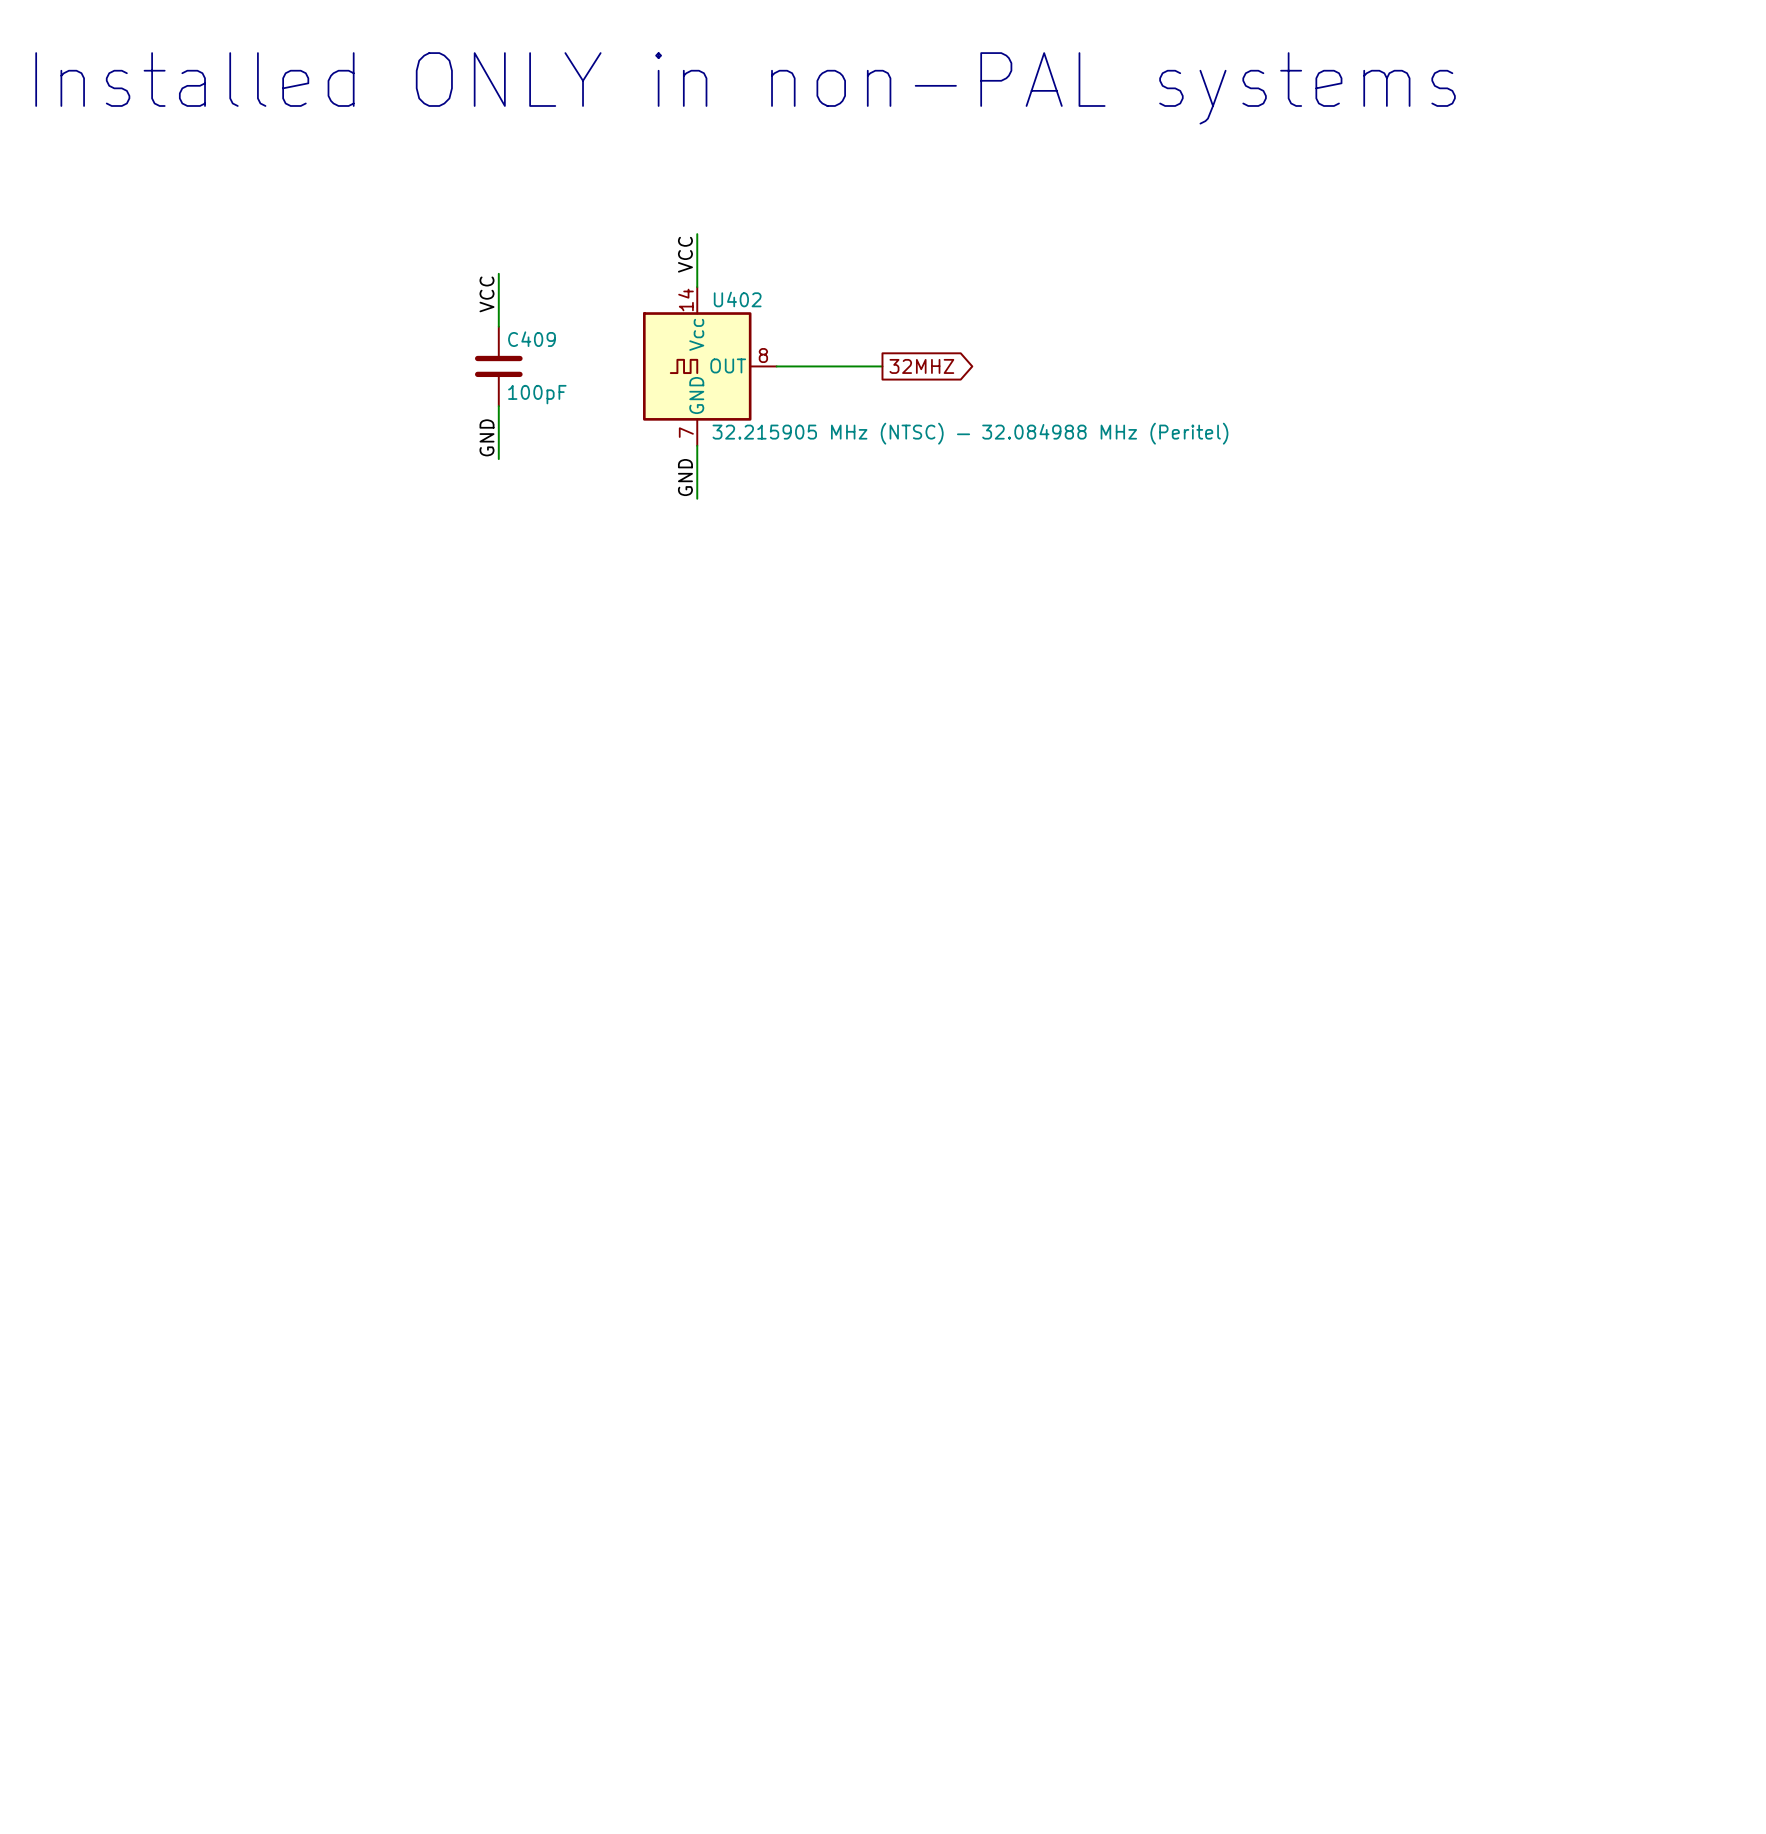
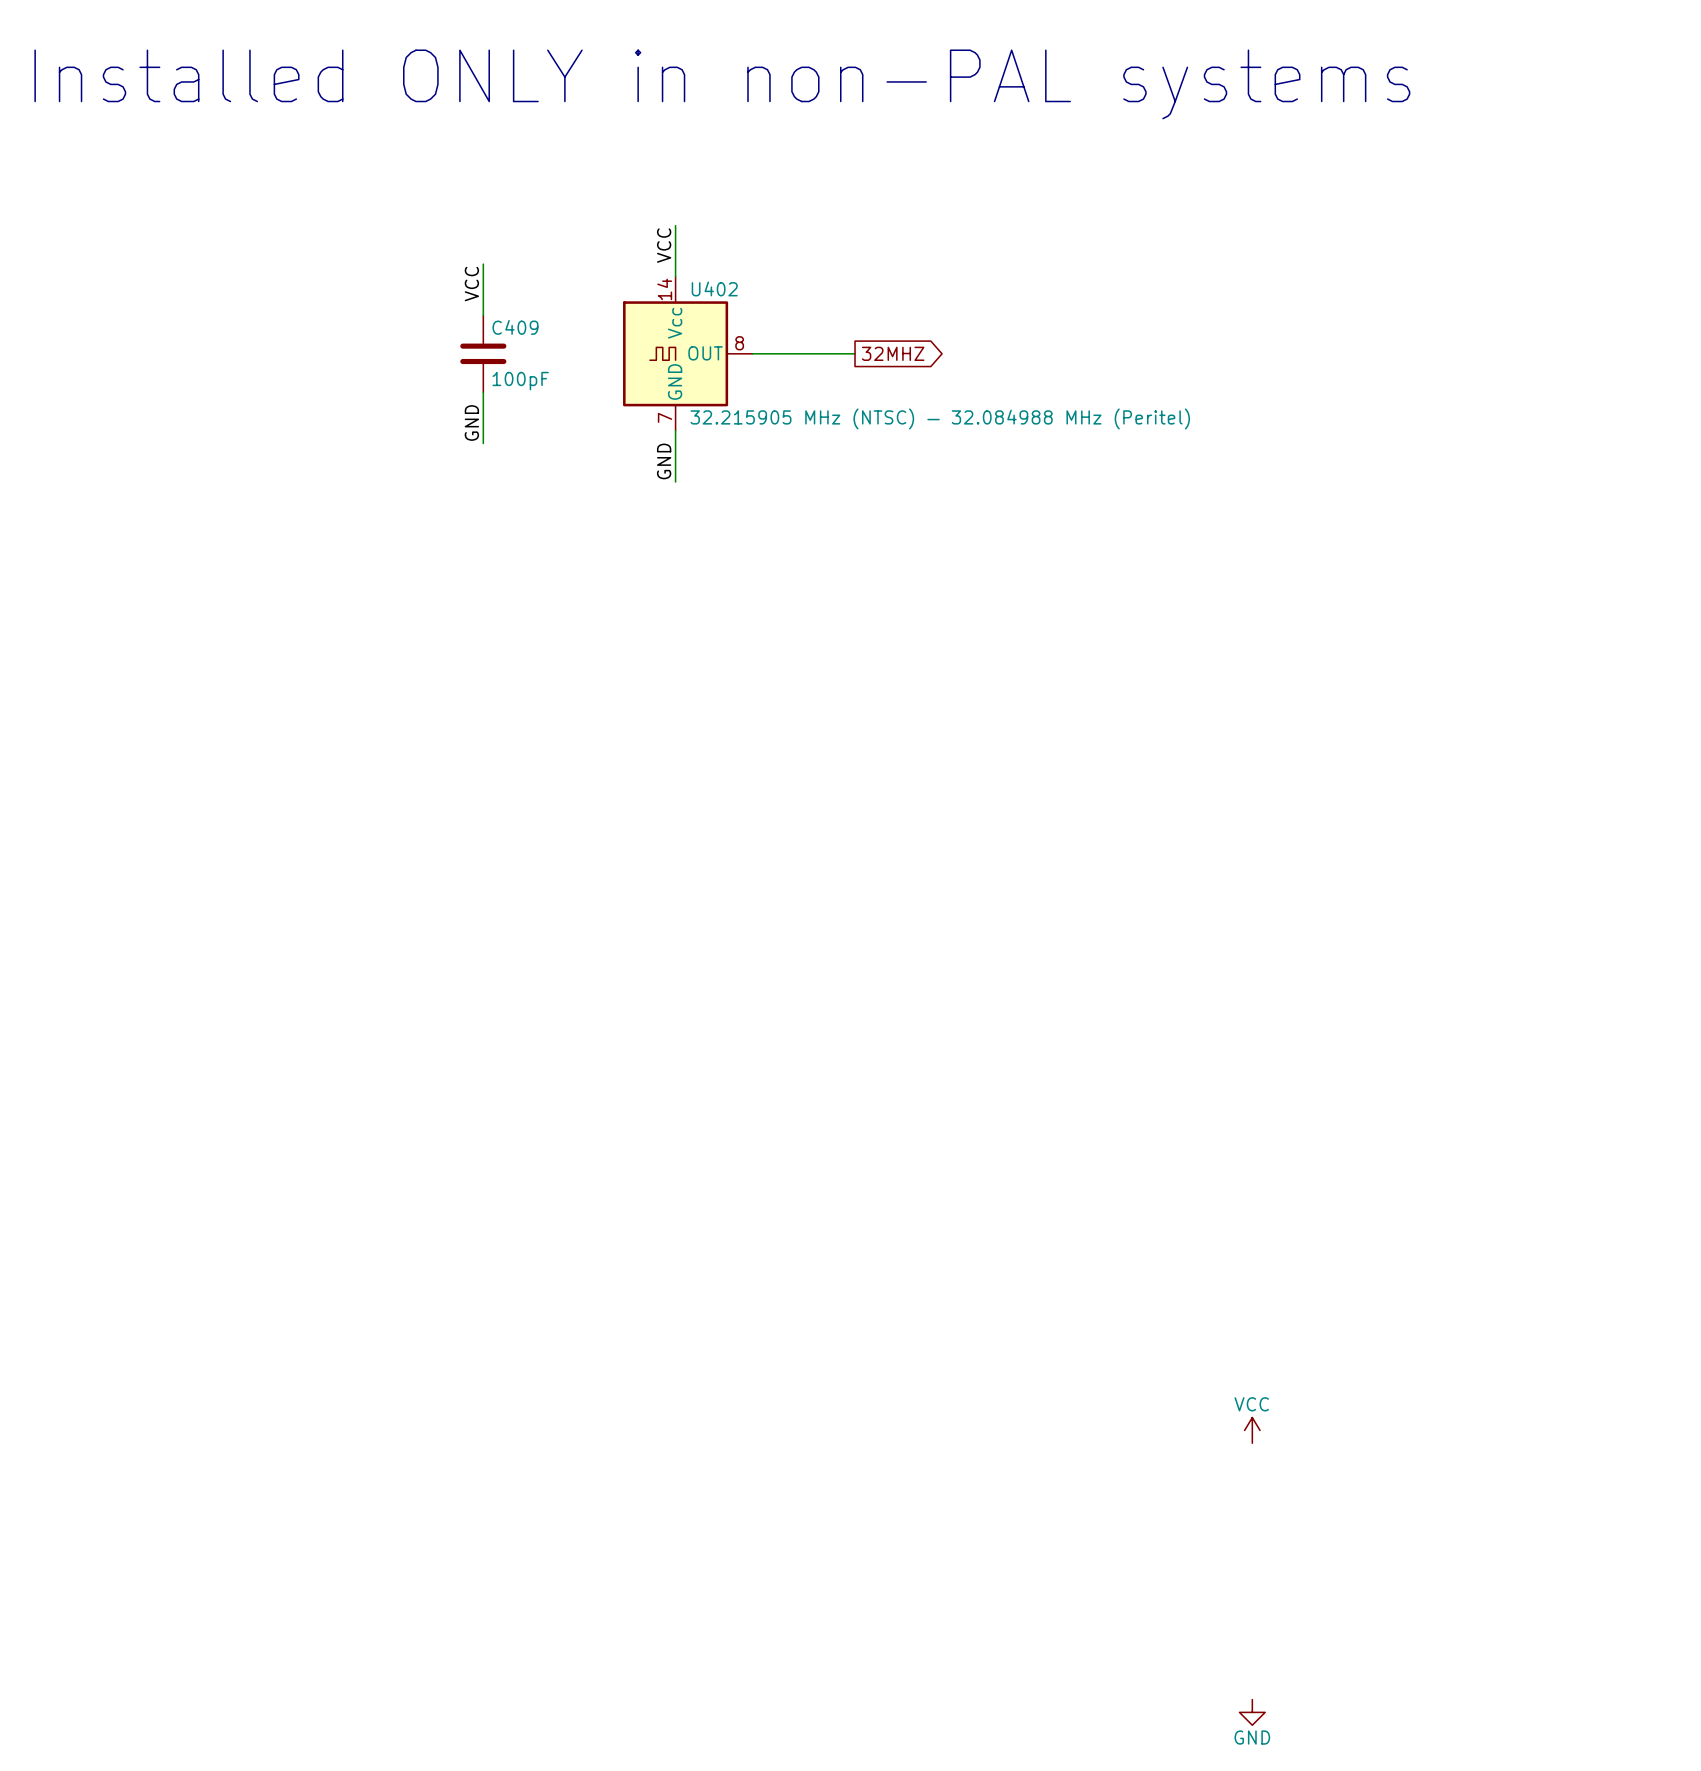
power symbol: none -> VCC (1252, 1430)
power symbol: none -> GND (1252, 1712)

